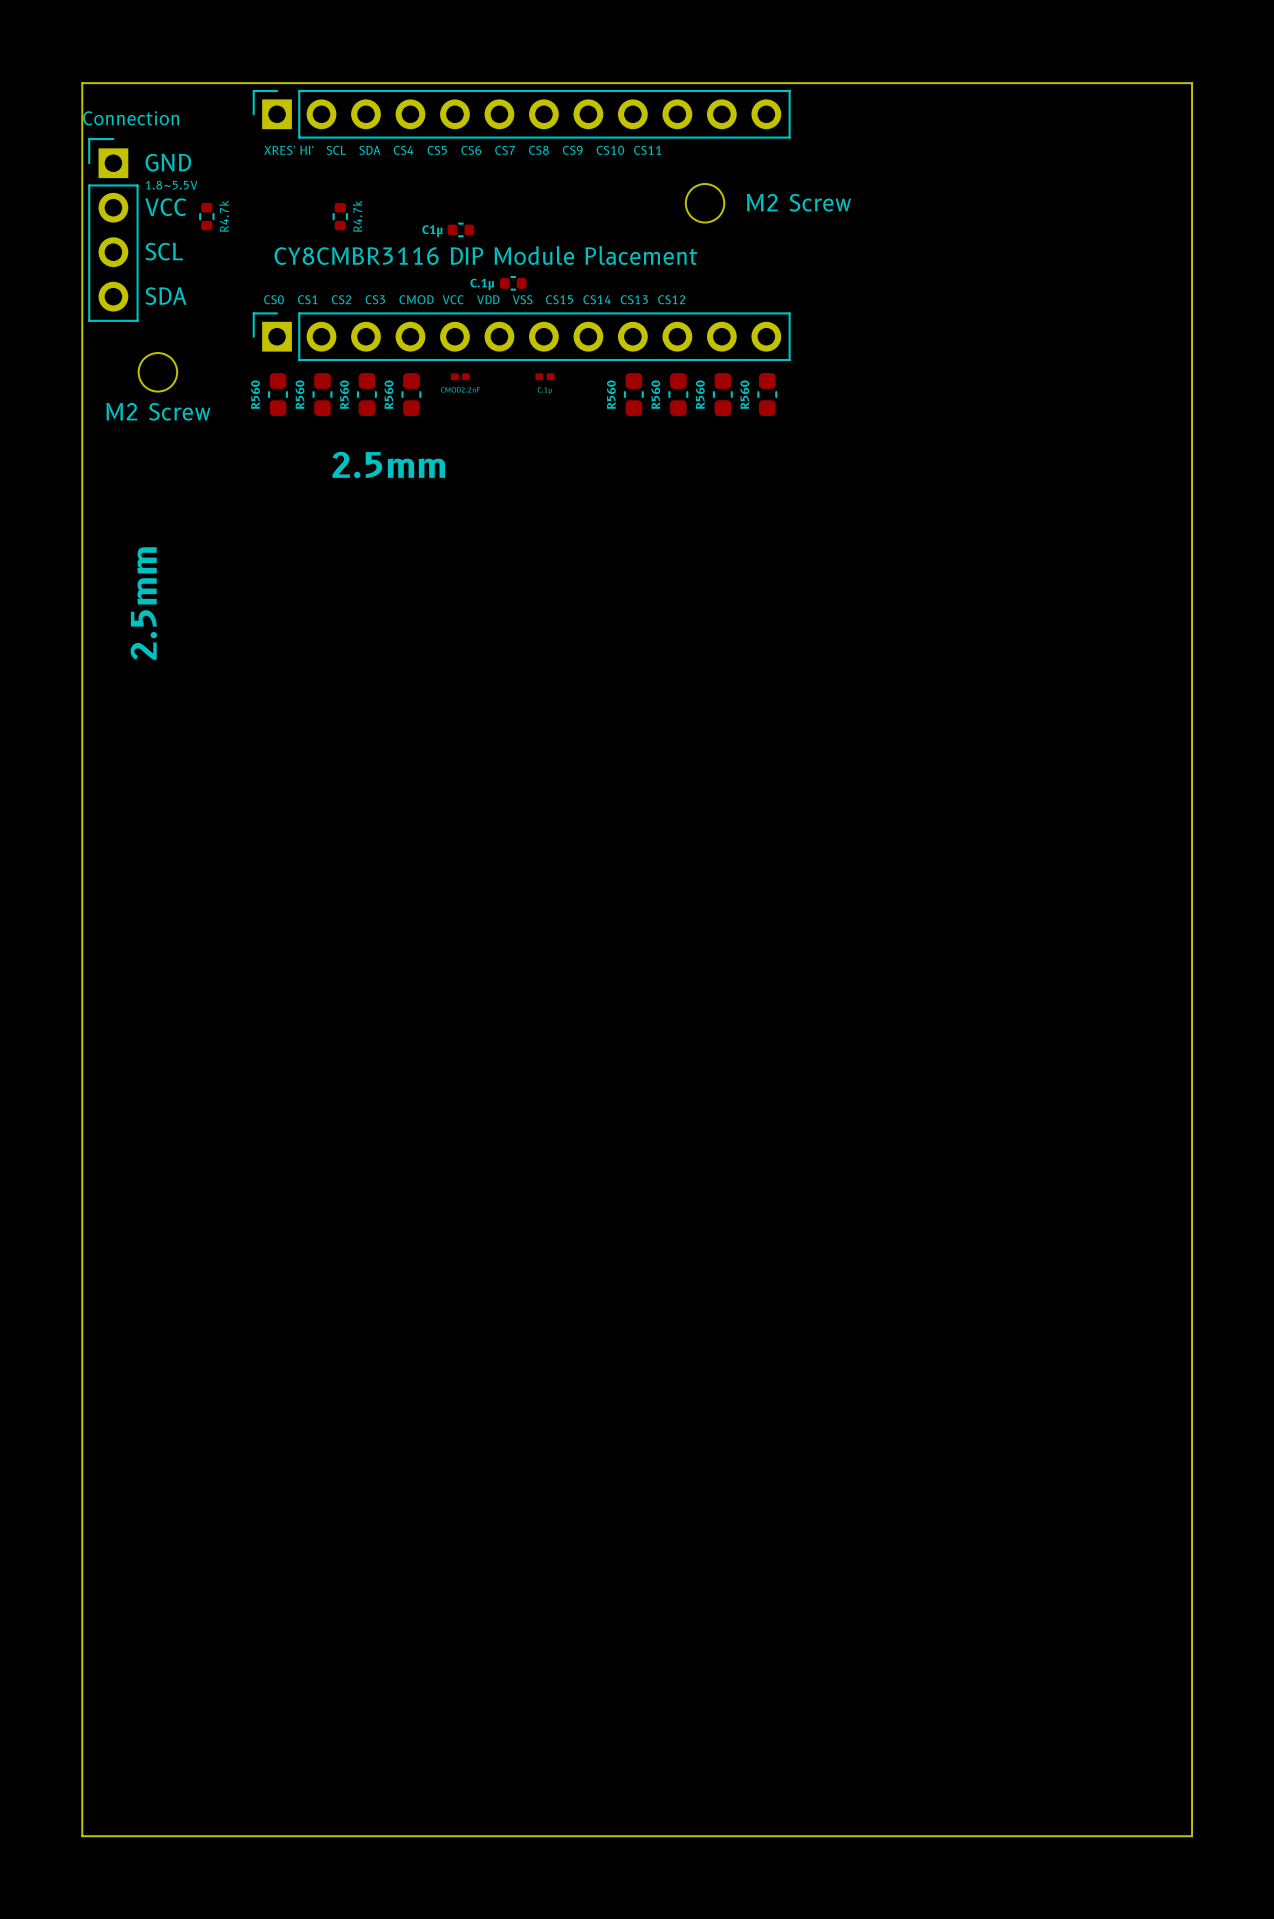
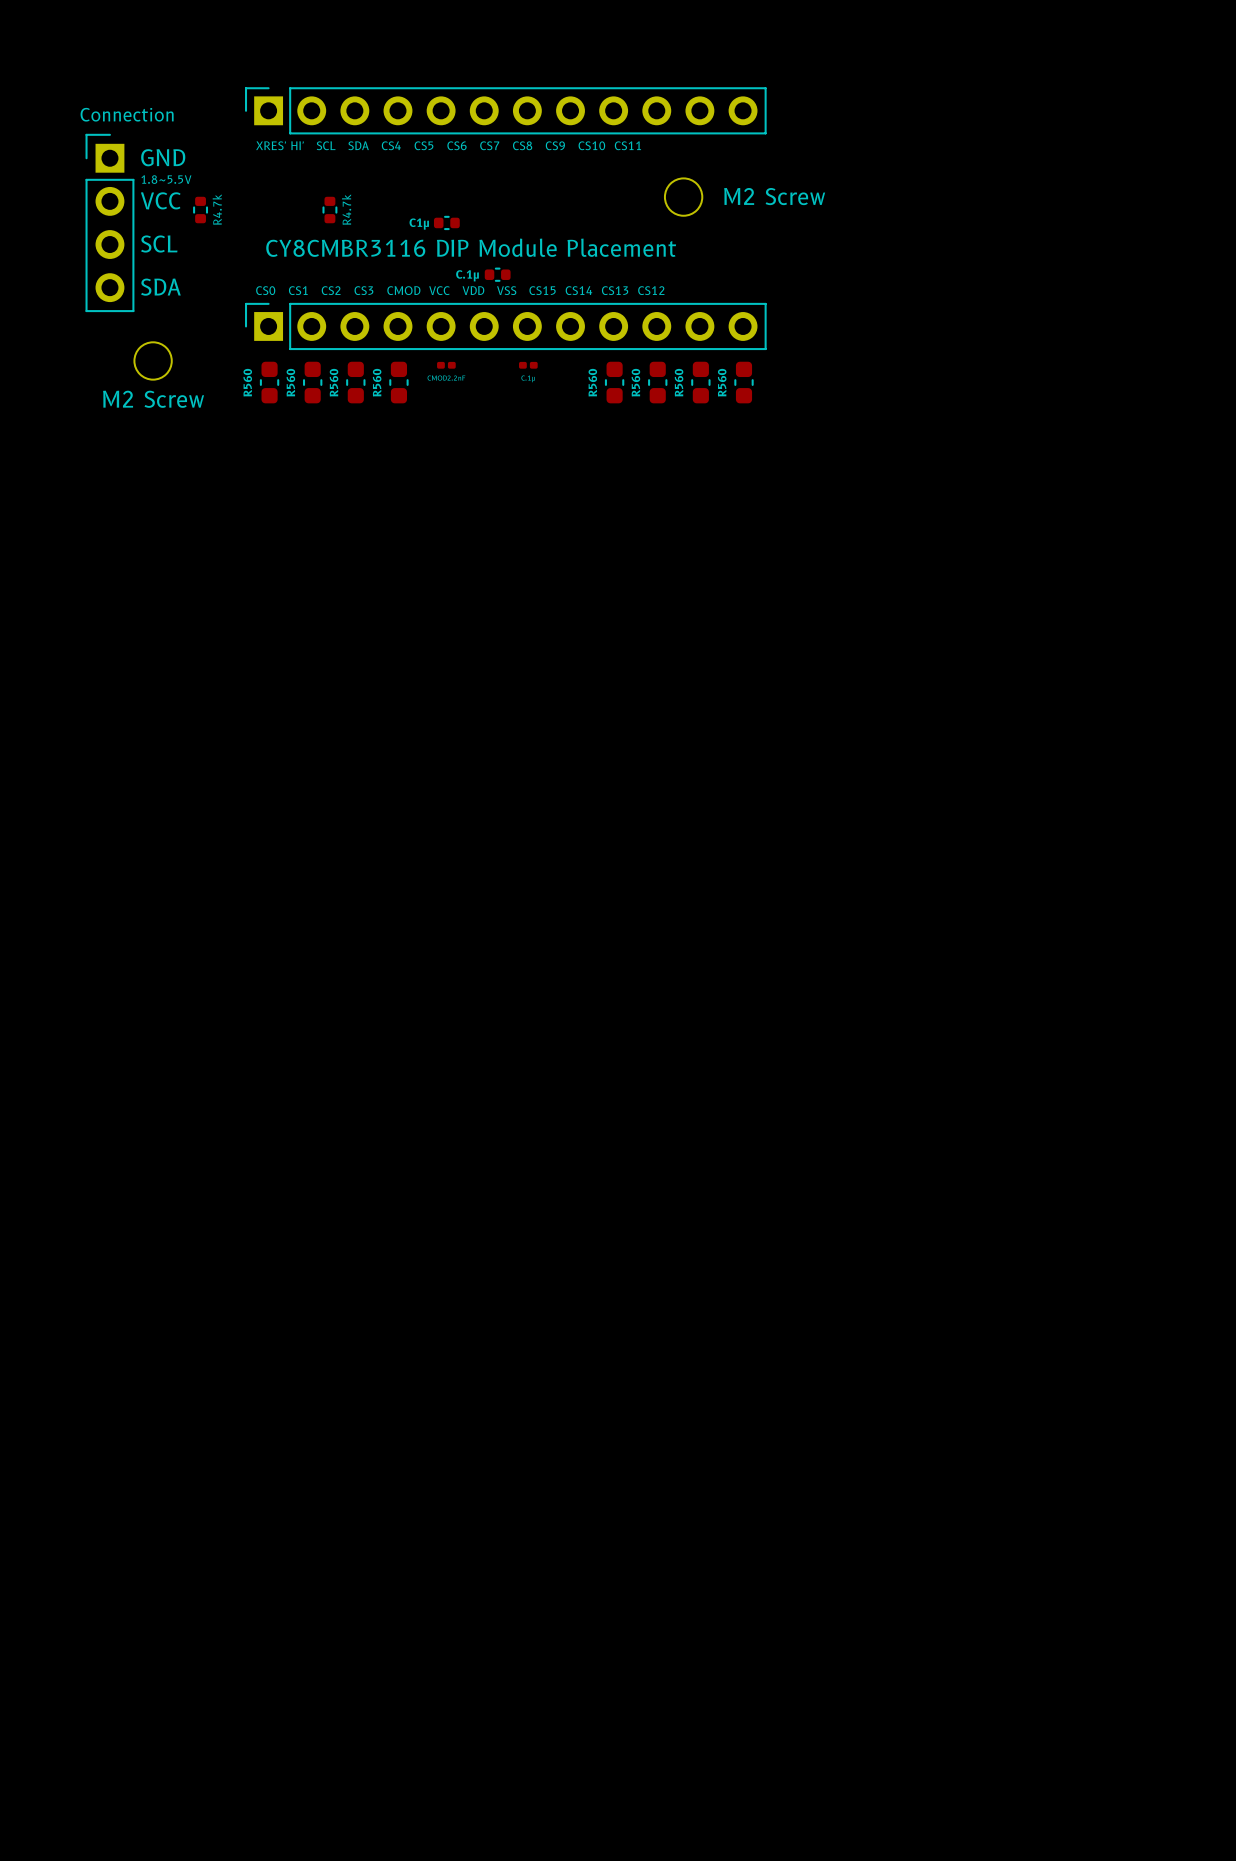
board edge: (82, 83) (1192, 83) (1192, 1836) (82, 1836) (82, 83) -> none
text: 2.5mm (388, 464) -> none
text: 2.5mm (143, 603) -> none

